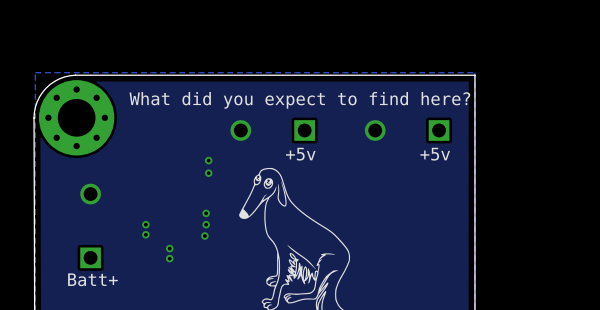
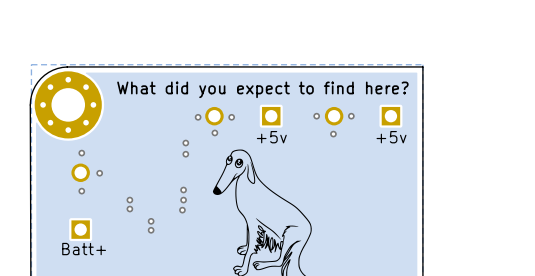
via: none -> (316, 116)
via: none -> (351, 116)
via: none -> (198, 117)
via: none -> (231, 117)
via: none -> (214, 132)
via: none -> (333, 134)
via: none -> (81, 153)
via: none -> (99, 173)
via: none -> (81, 191)

